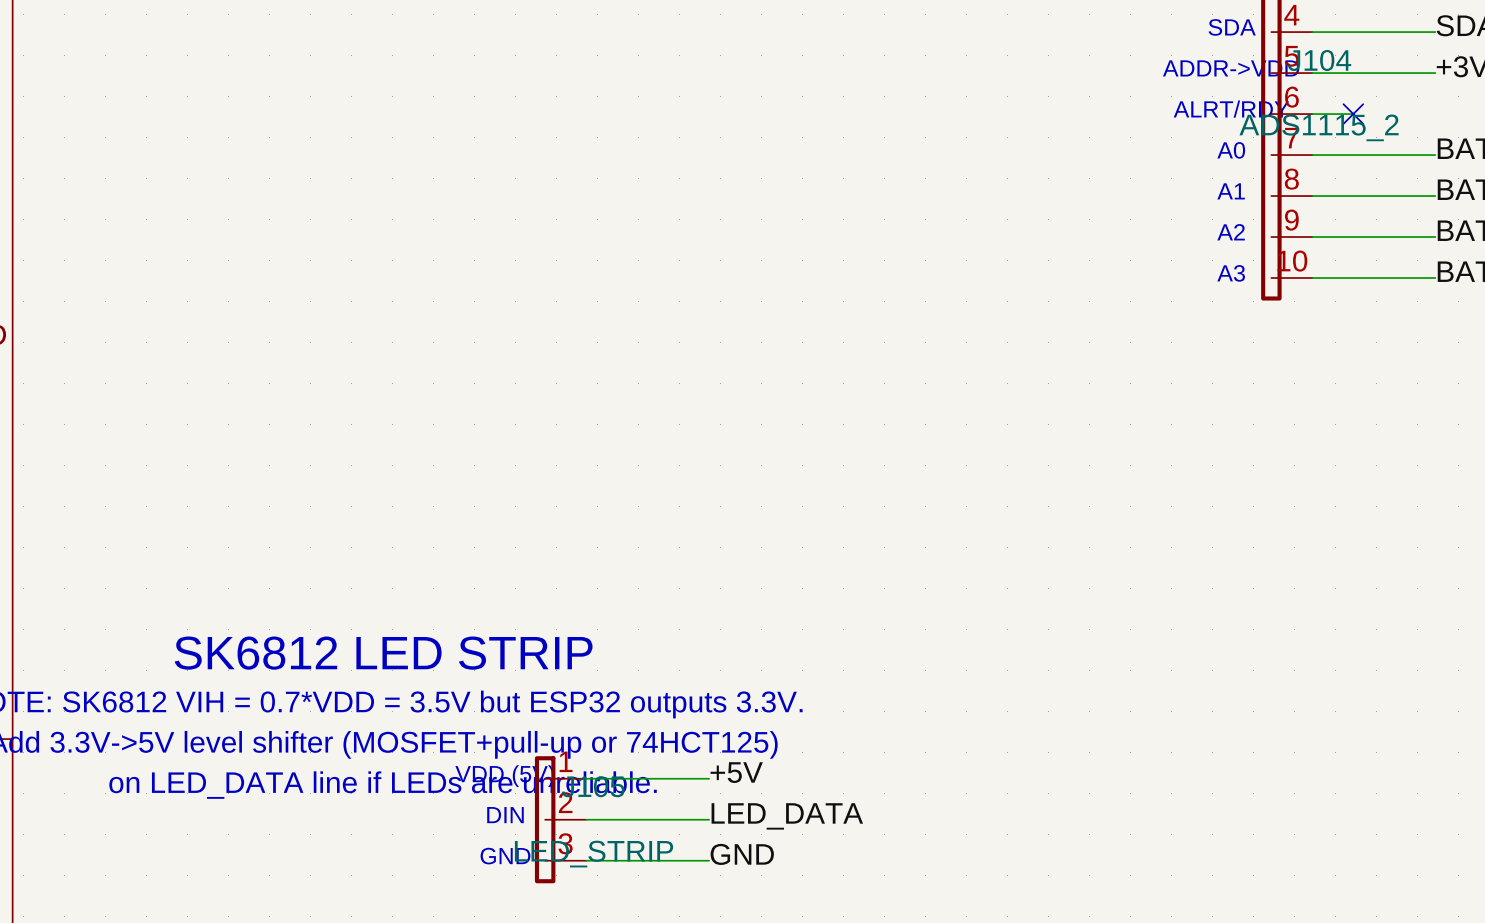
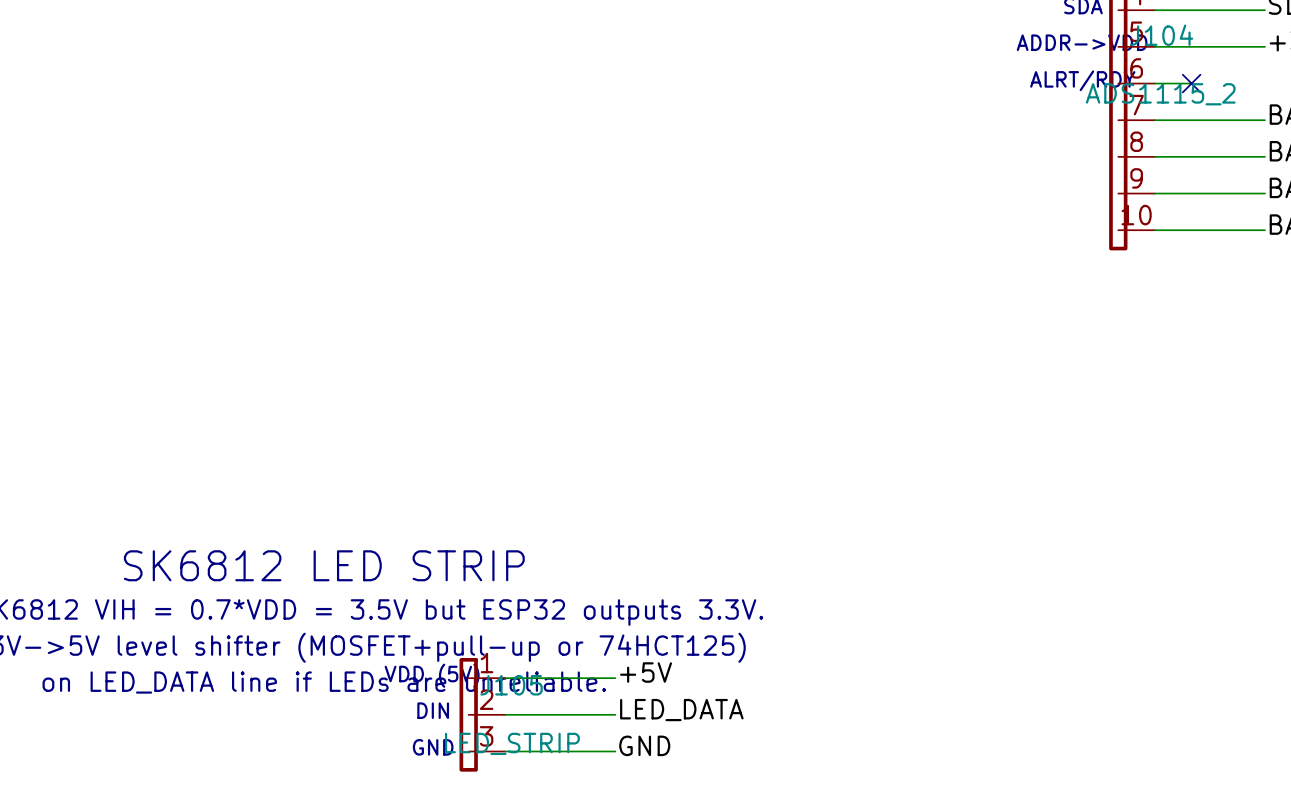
text: A0 (1231, 150) -> none
text: A1 (1231, 191) -> none
text: A2 (1231, 232) -> none
text: A3 (1231, 273) -> none

